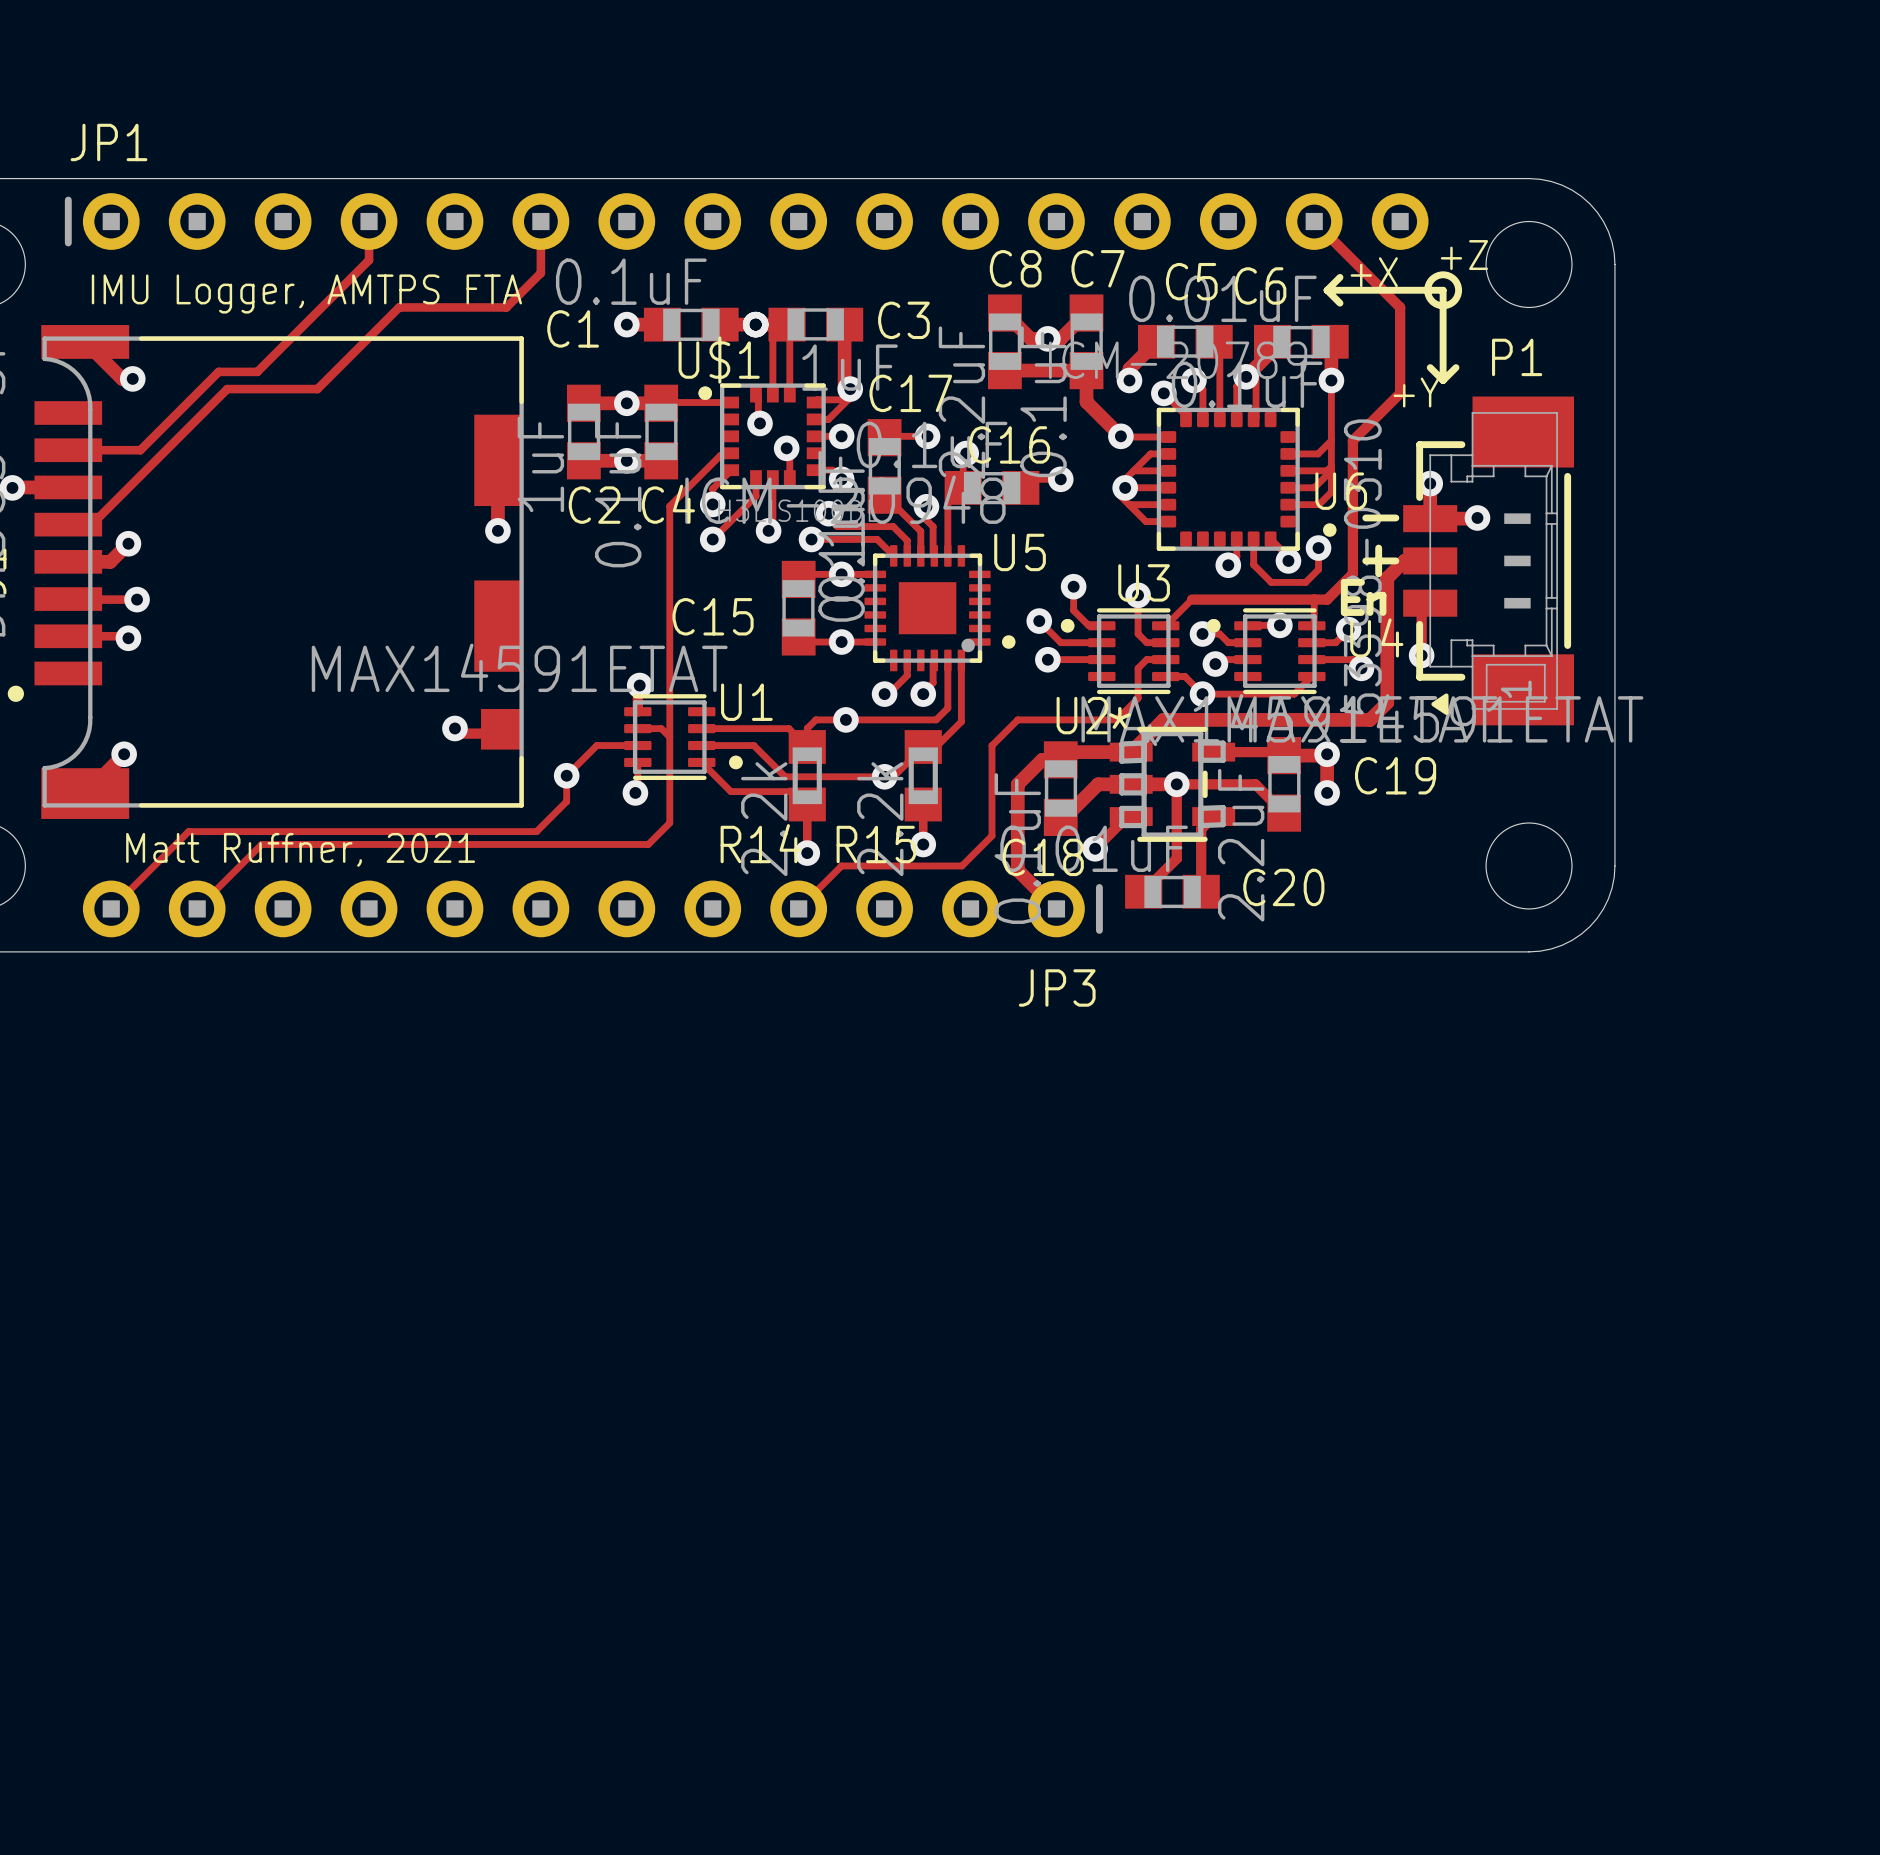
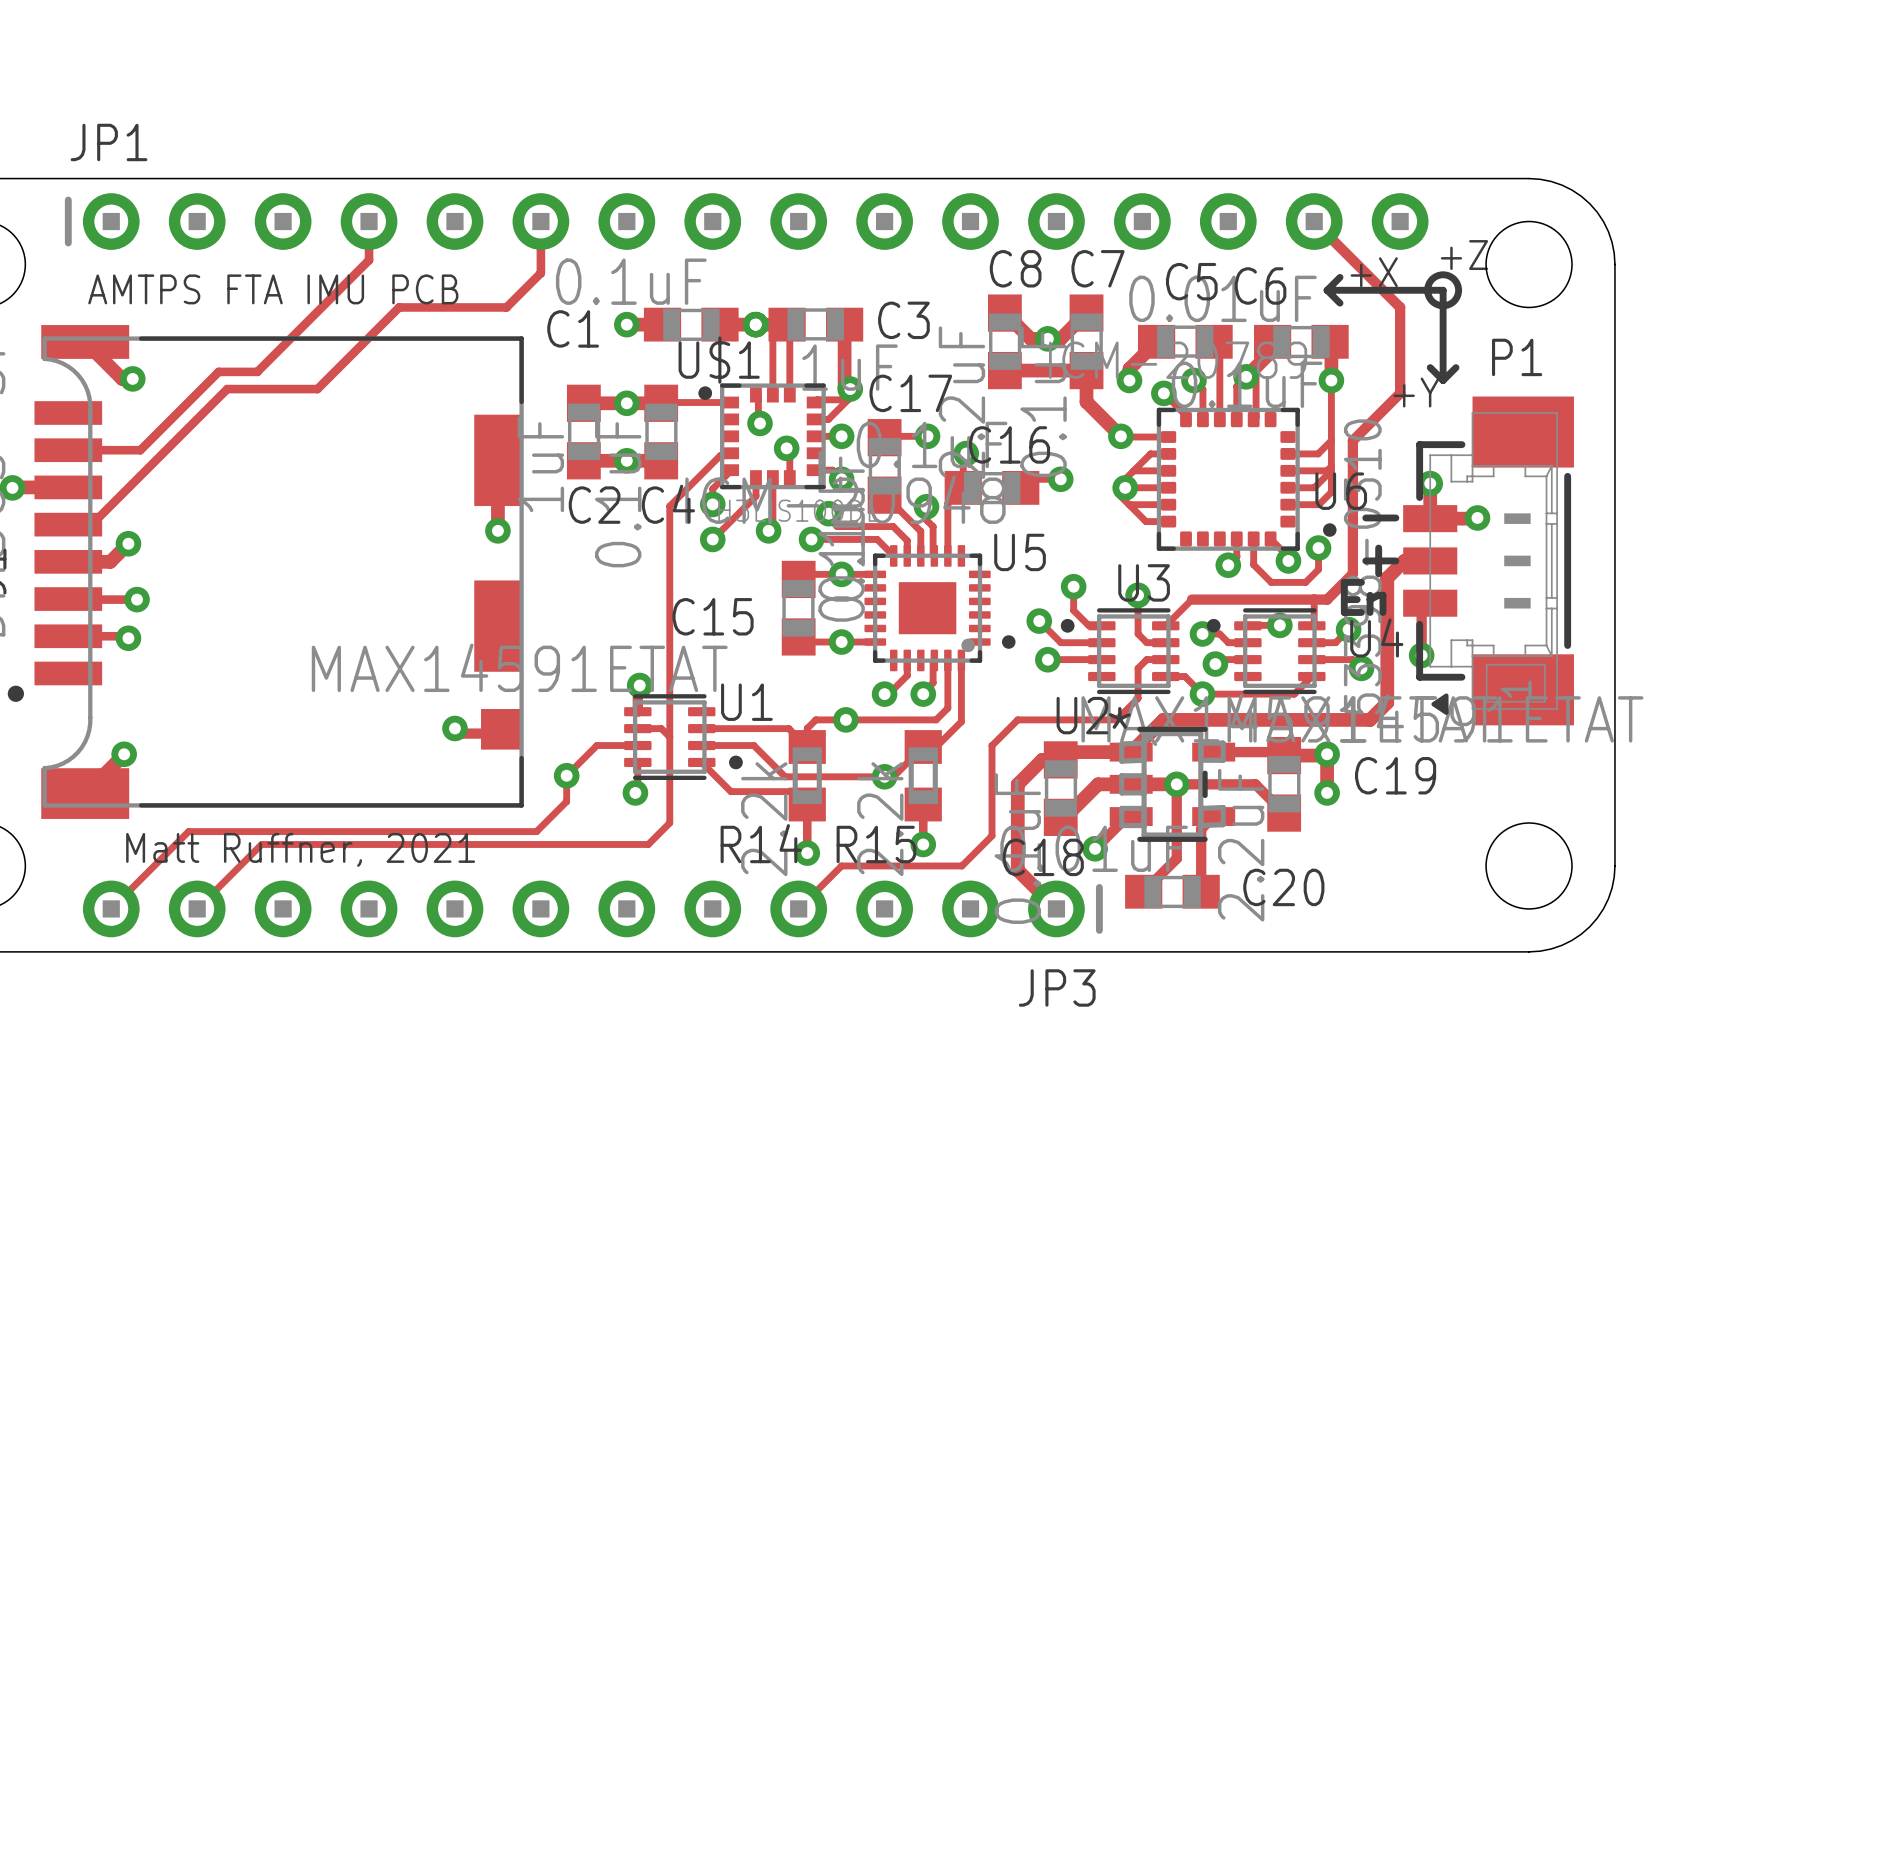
text: IMU Logger, AMTPS FTA (306, 293) -> AMTPS FTA IMU PCB (273, 289)

